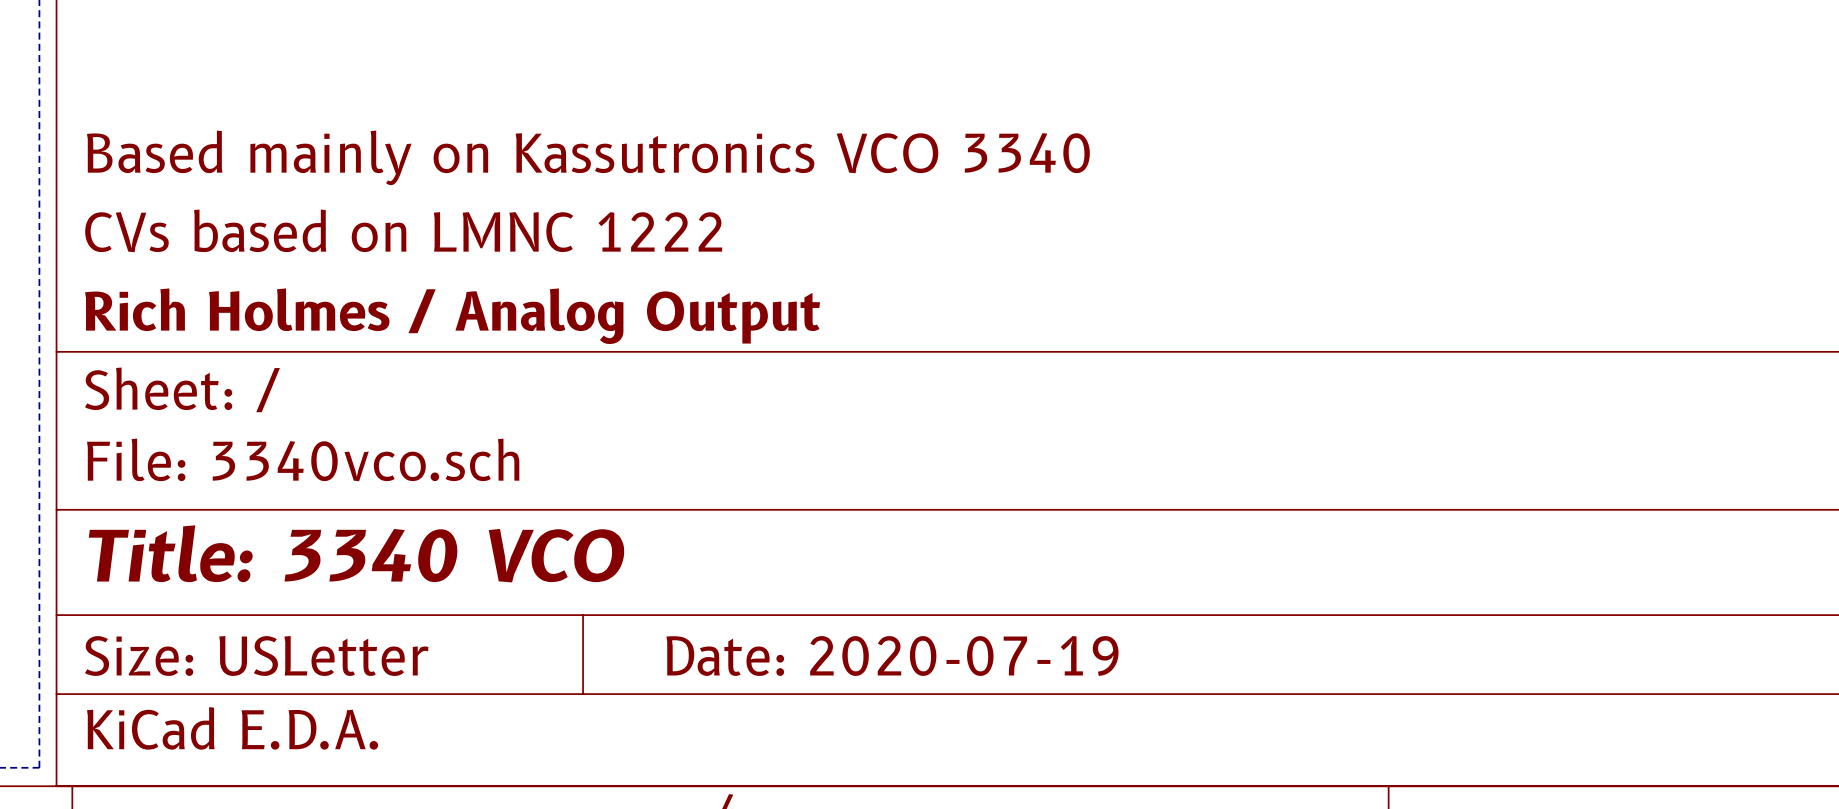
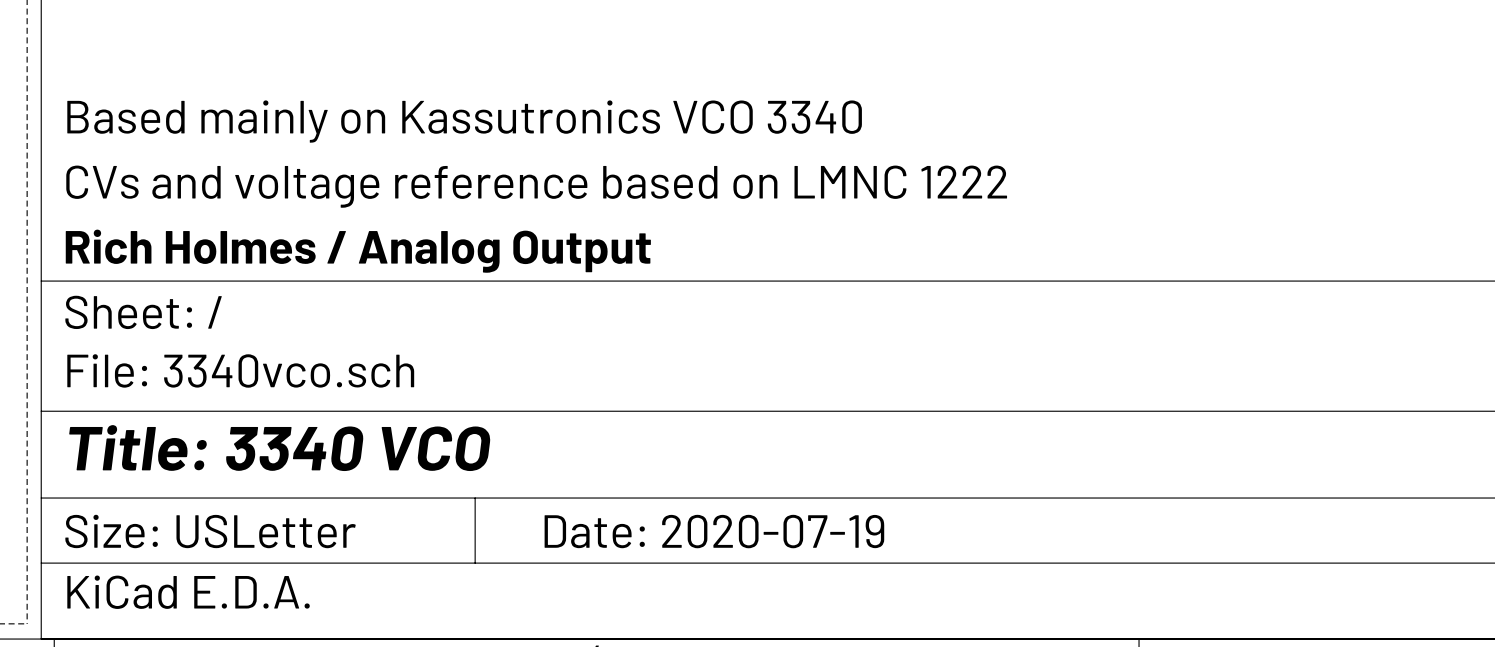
title block: CVs based on LMNC 1222 (403, 230) -> CVs and voltage reference based on LMNC 1222 (536, 186)

